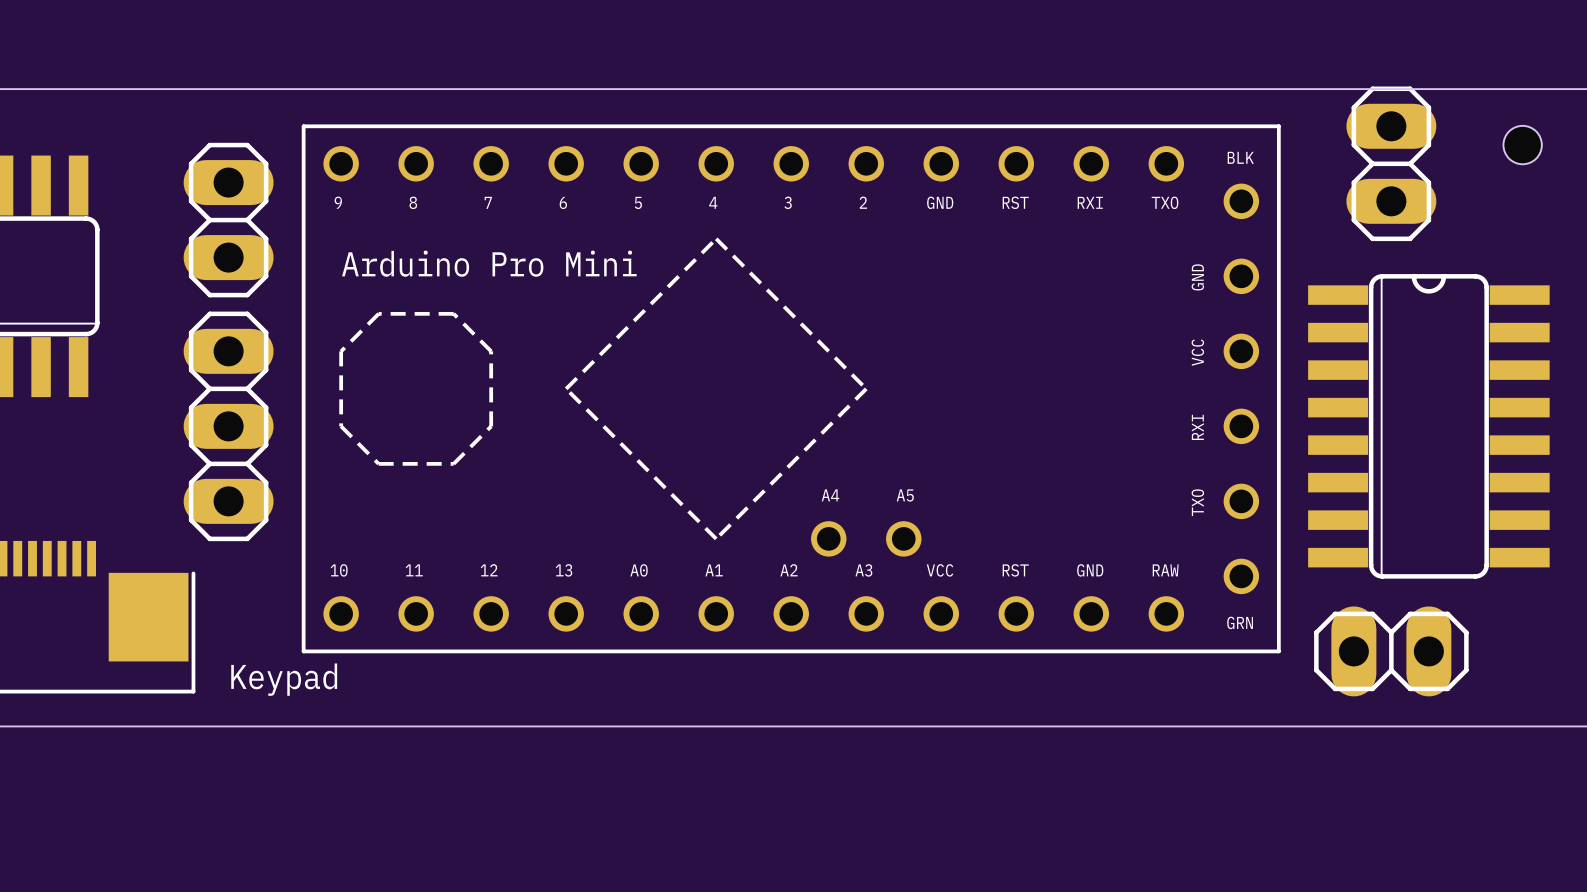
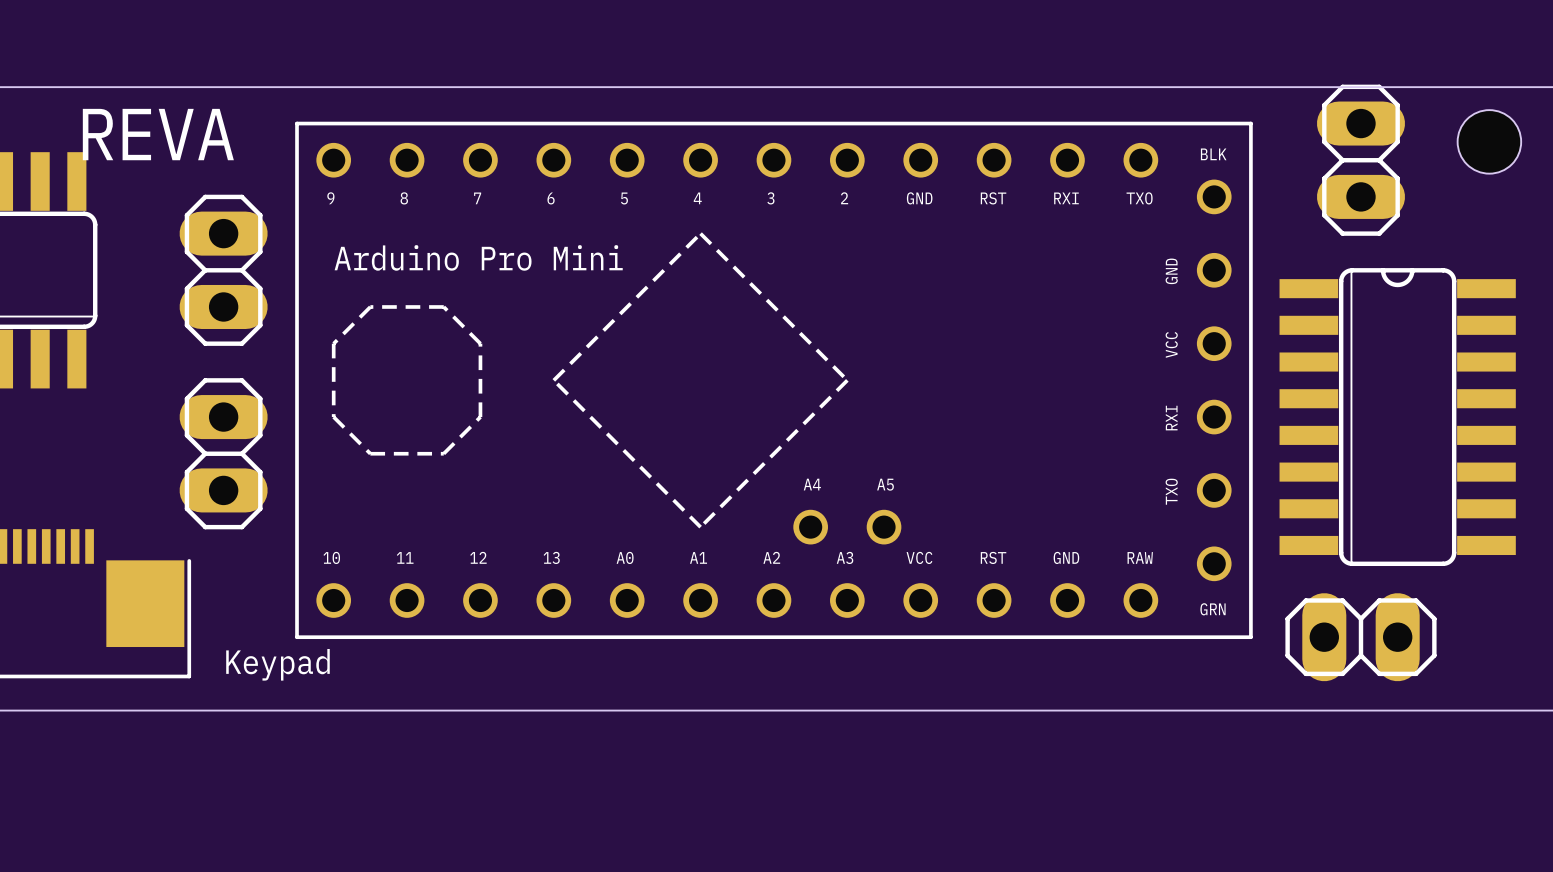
hole size: [1503, 125, 1542, 165] -> [1457, 110, 1522, 174]
text: none -> REVA (158, 134)
part position: (228, 220) -> (223, 270)
part: (228, 426) -> none
part: none -> (223, 453)

